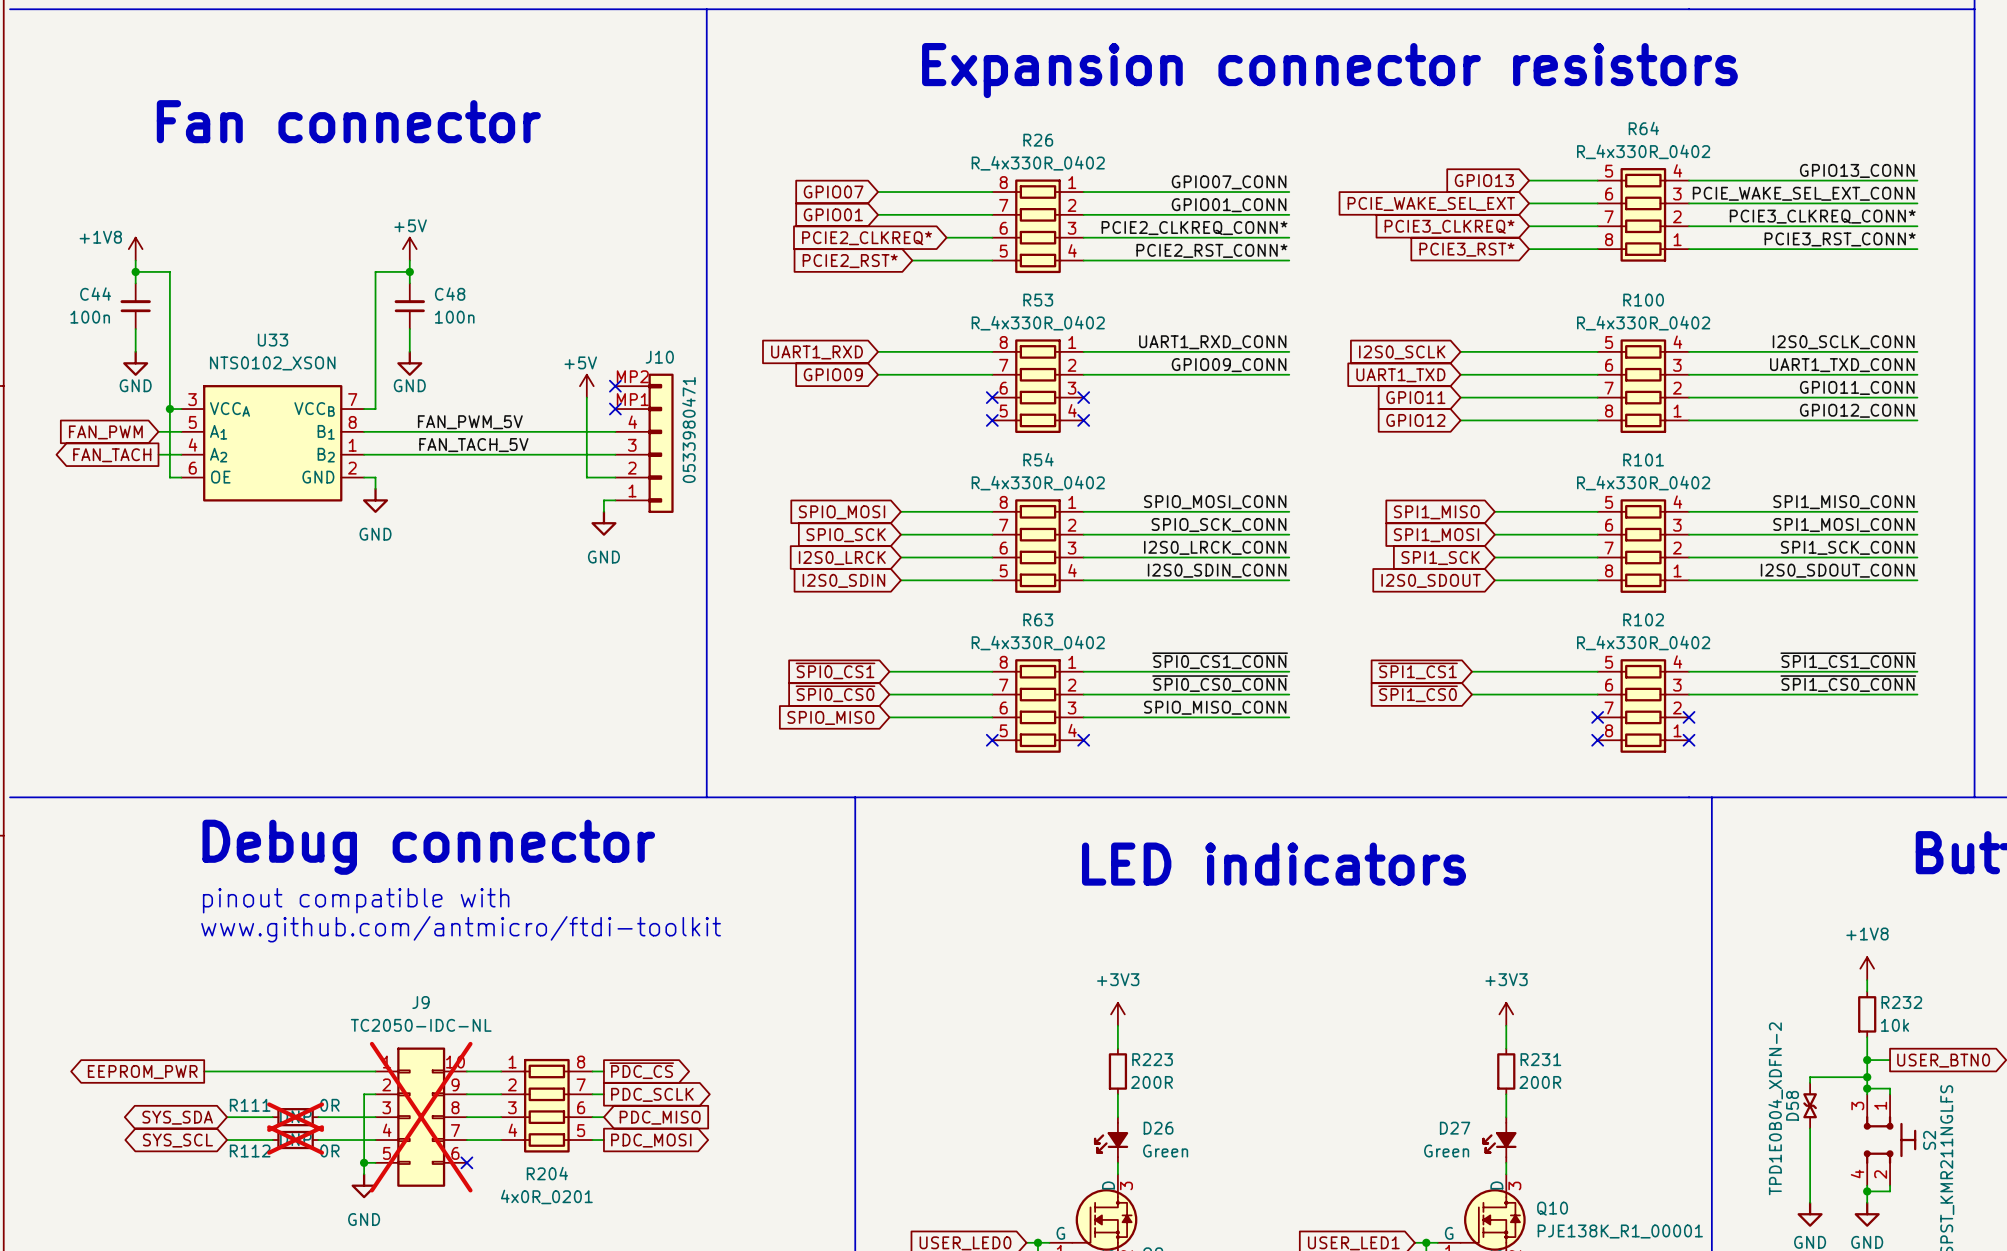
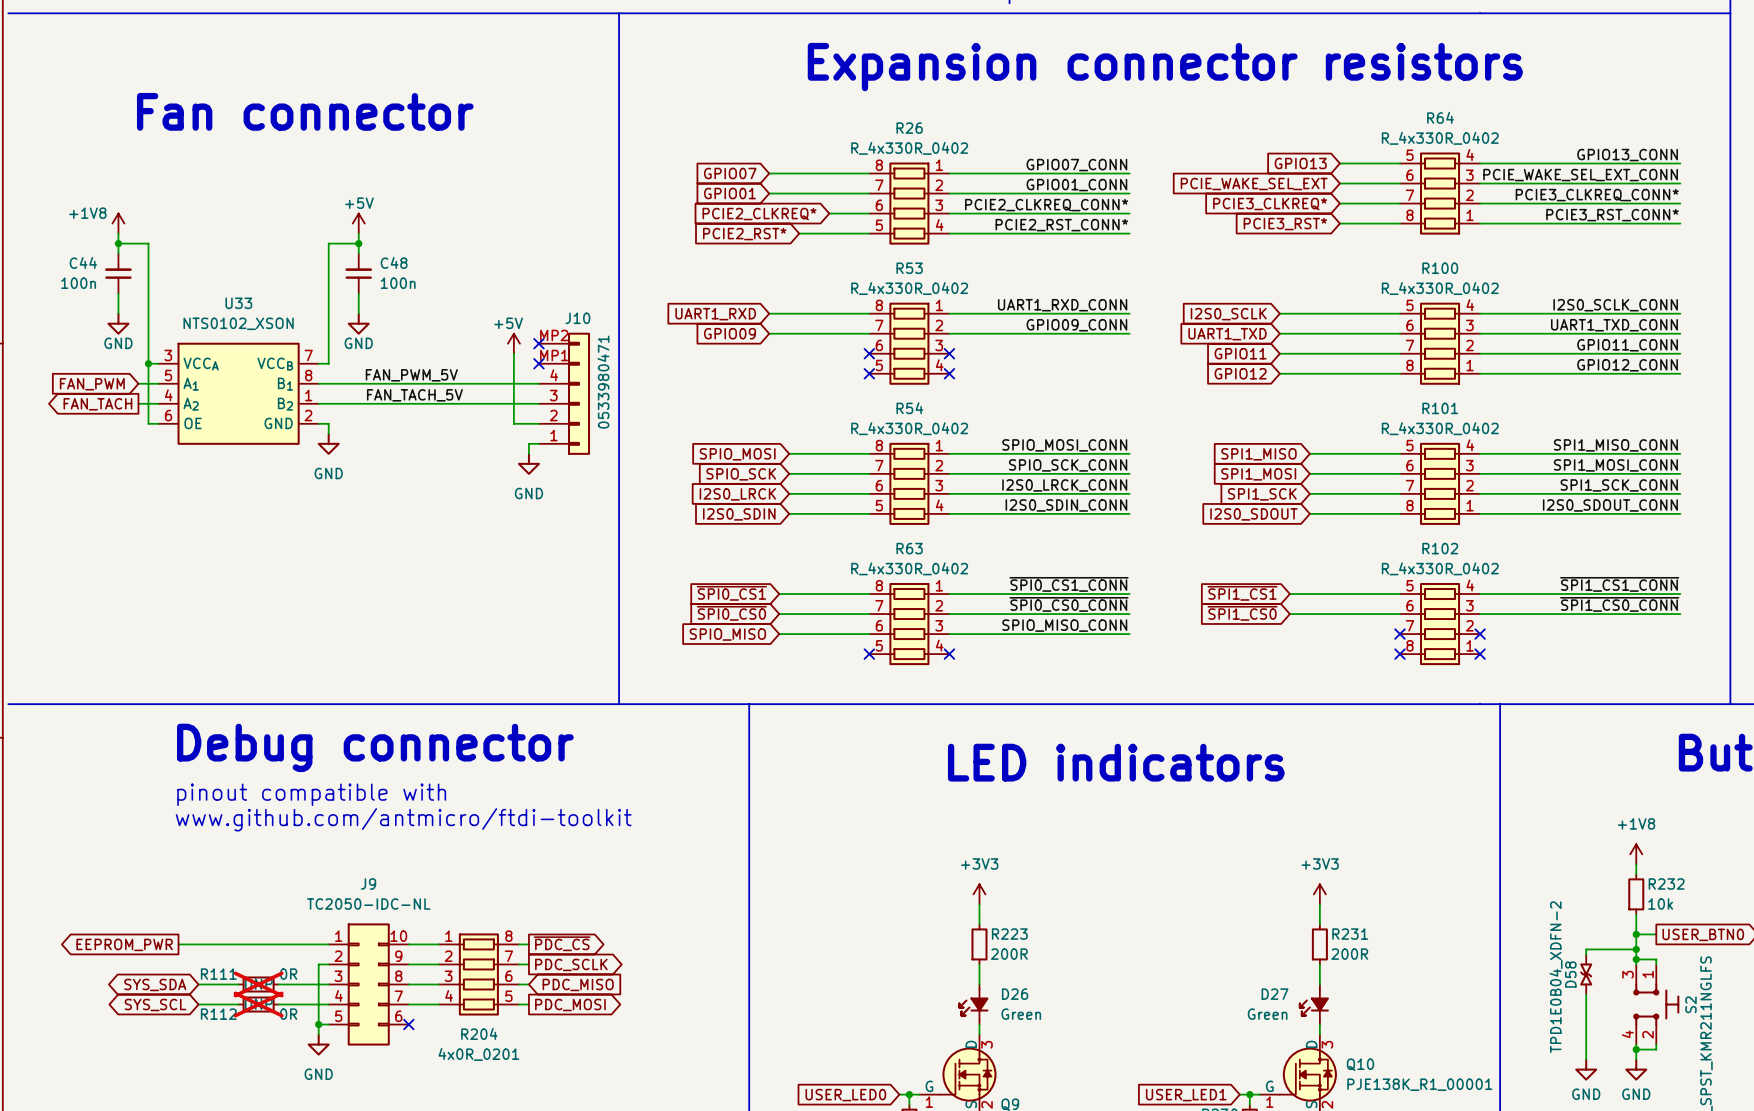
J9 do-not-place cross: (421, 1117) -> none

